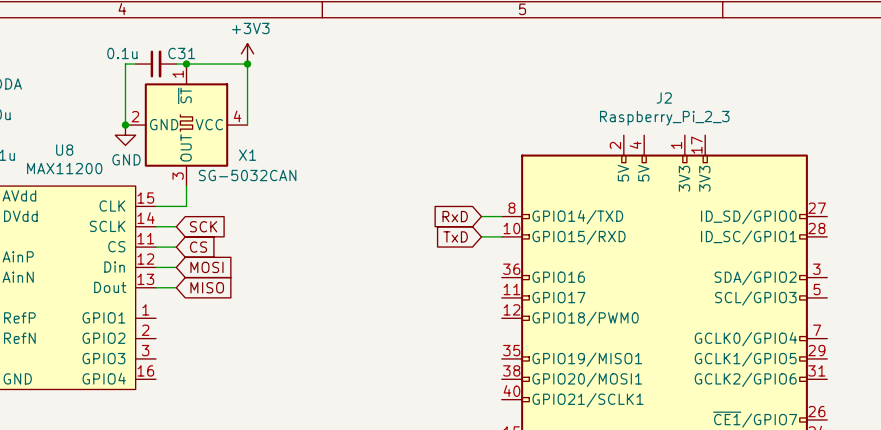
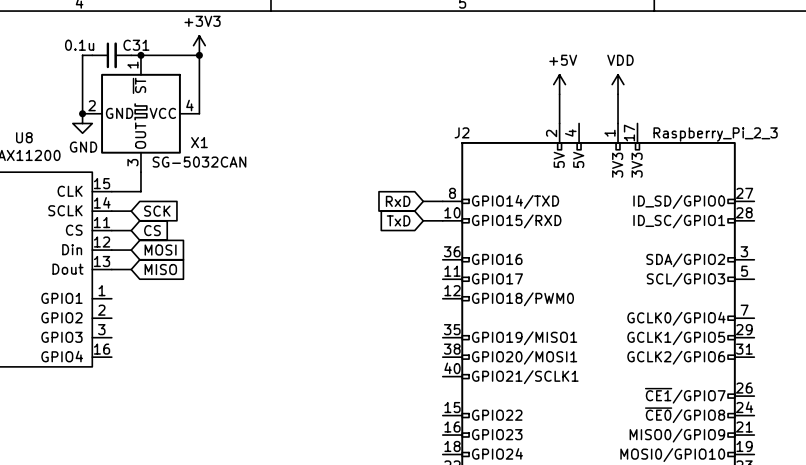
power symbol: none -> +5V (559, 84)
power symbol: none -> VDD (618, 84)
J2 name position: J2 (664, 98) -> J2 (462, 132)
wire: none -> (559, 94) (559, 123)
wire: none -> (618, 94) (618, 123)
J2 value position: Raspberry_Pi_2_3 (664, 118) -> Raspberry_Pi_2_3 (715, 134)

